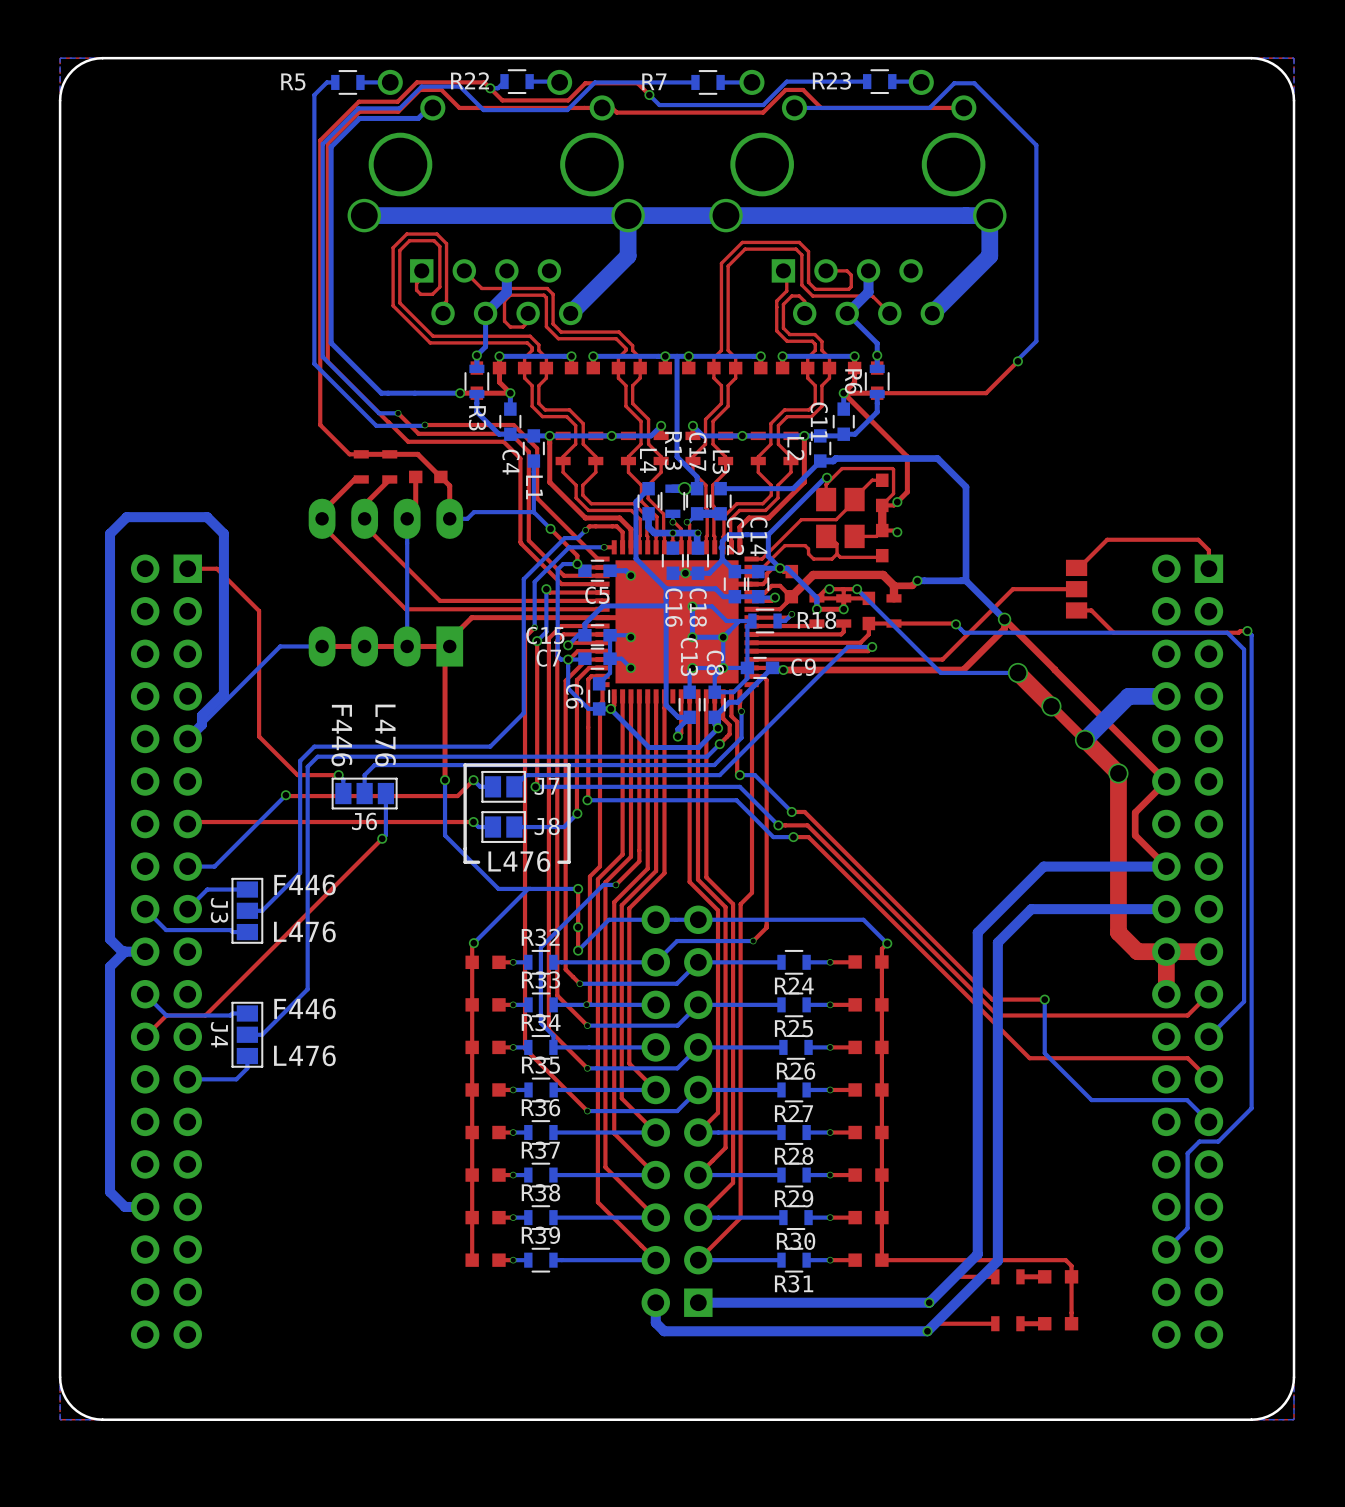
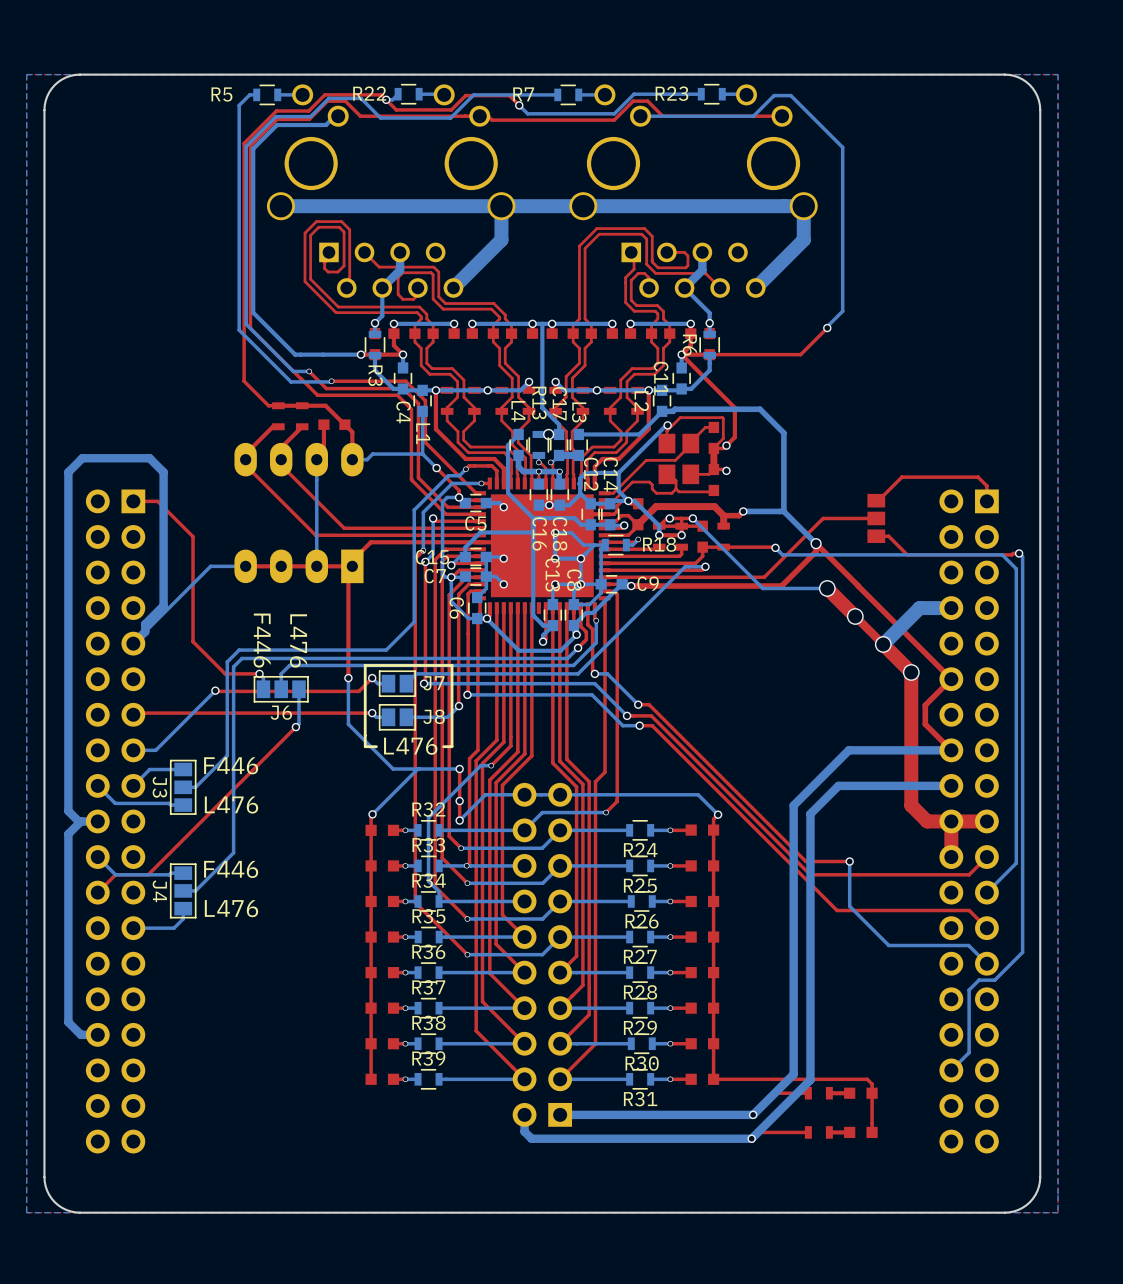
board edge: (123, 58) (97, 58) (81, 63) (65, 79) (60, 100) (60, 1377) (65, 1398) (81, 1414) (97, 1419) (123, 1419) -> (80, 74) (66, 77) (54, 85) (47, 96) (44, 110) (44, 1177) (47, 1190) (54, 1202) (66, 1209) (80, 1212)
board edge: (1230, 58) (1257, 58) (1272, 63) (1288, 79) (1294, 100) (1294, 1377) (1288, 1398) (1272, 1414) (1257, 1419) (1230, 1419) -> (1004, 74) (1018, 77) (1029, 85) (1037, 96) (1040, 110) (1040, 1177) (1037, 1190) (1029, 1202) (1018, 1209) (1004, 1212)

